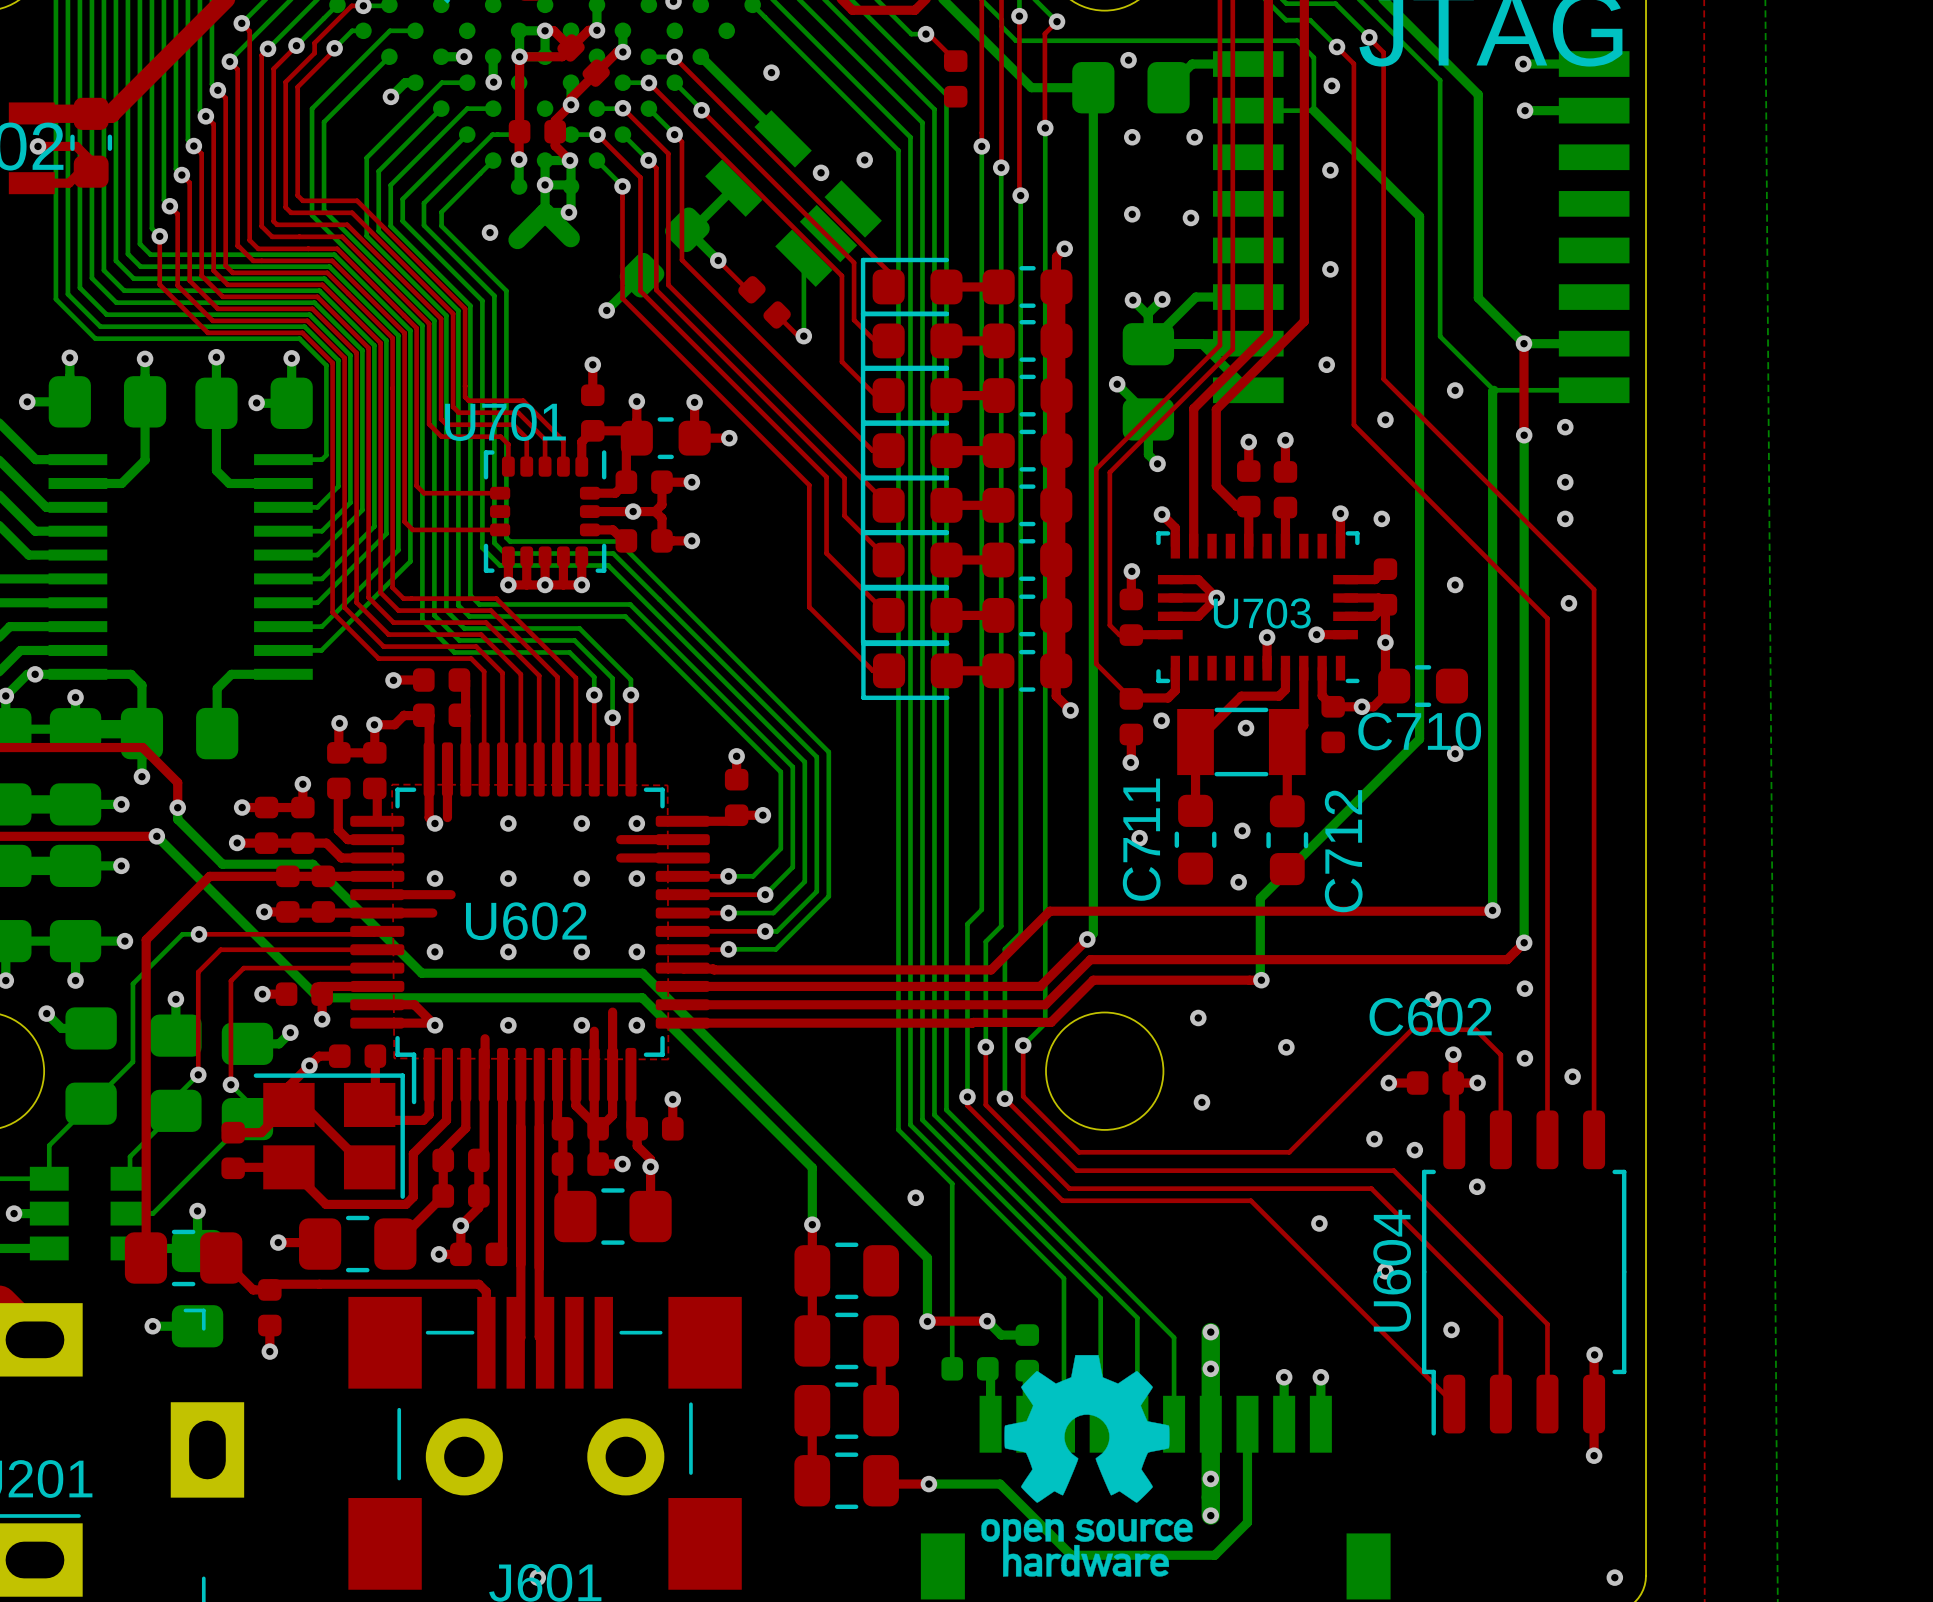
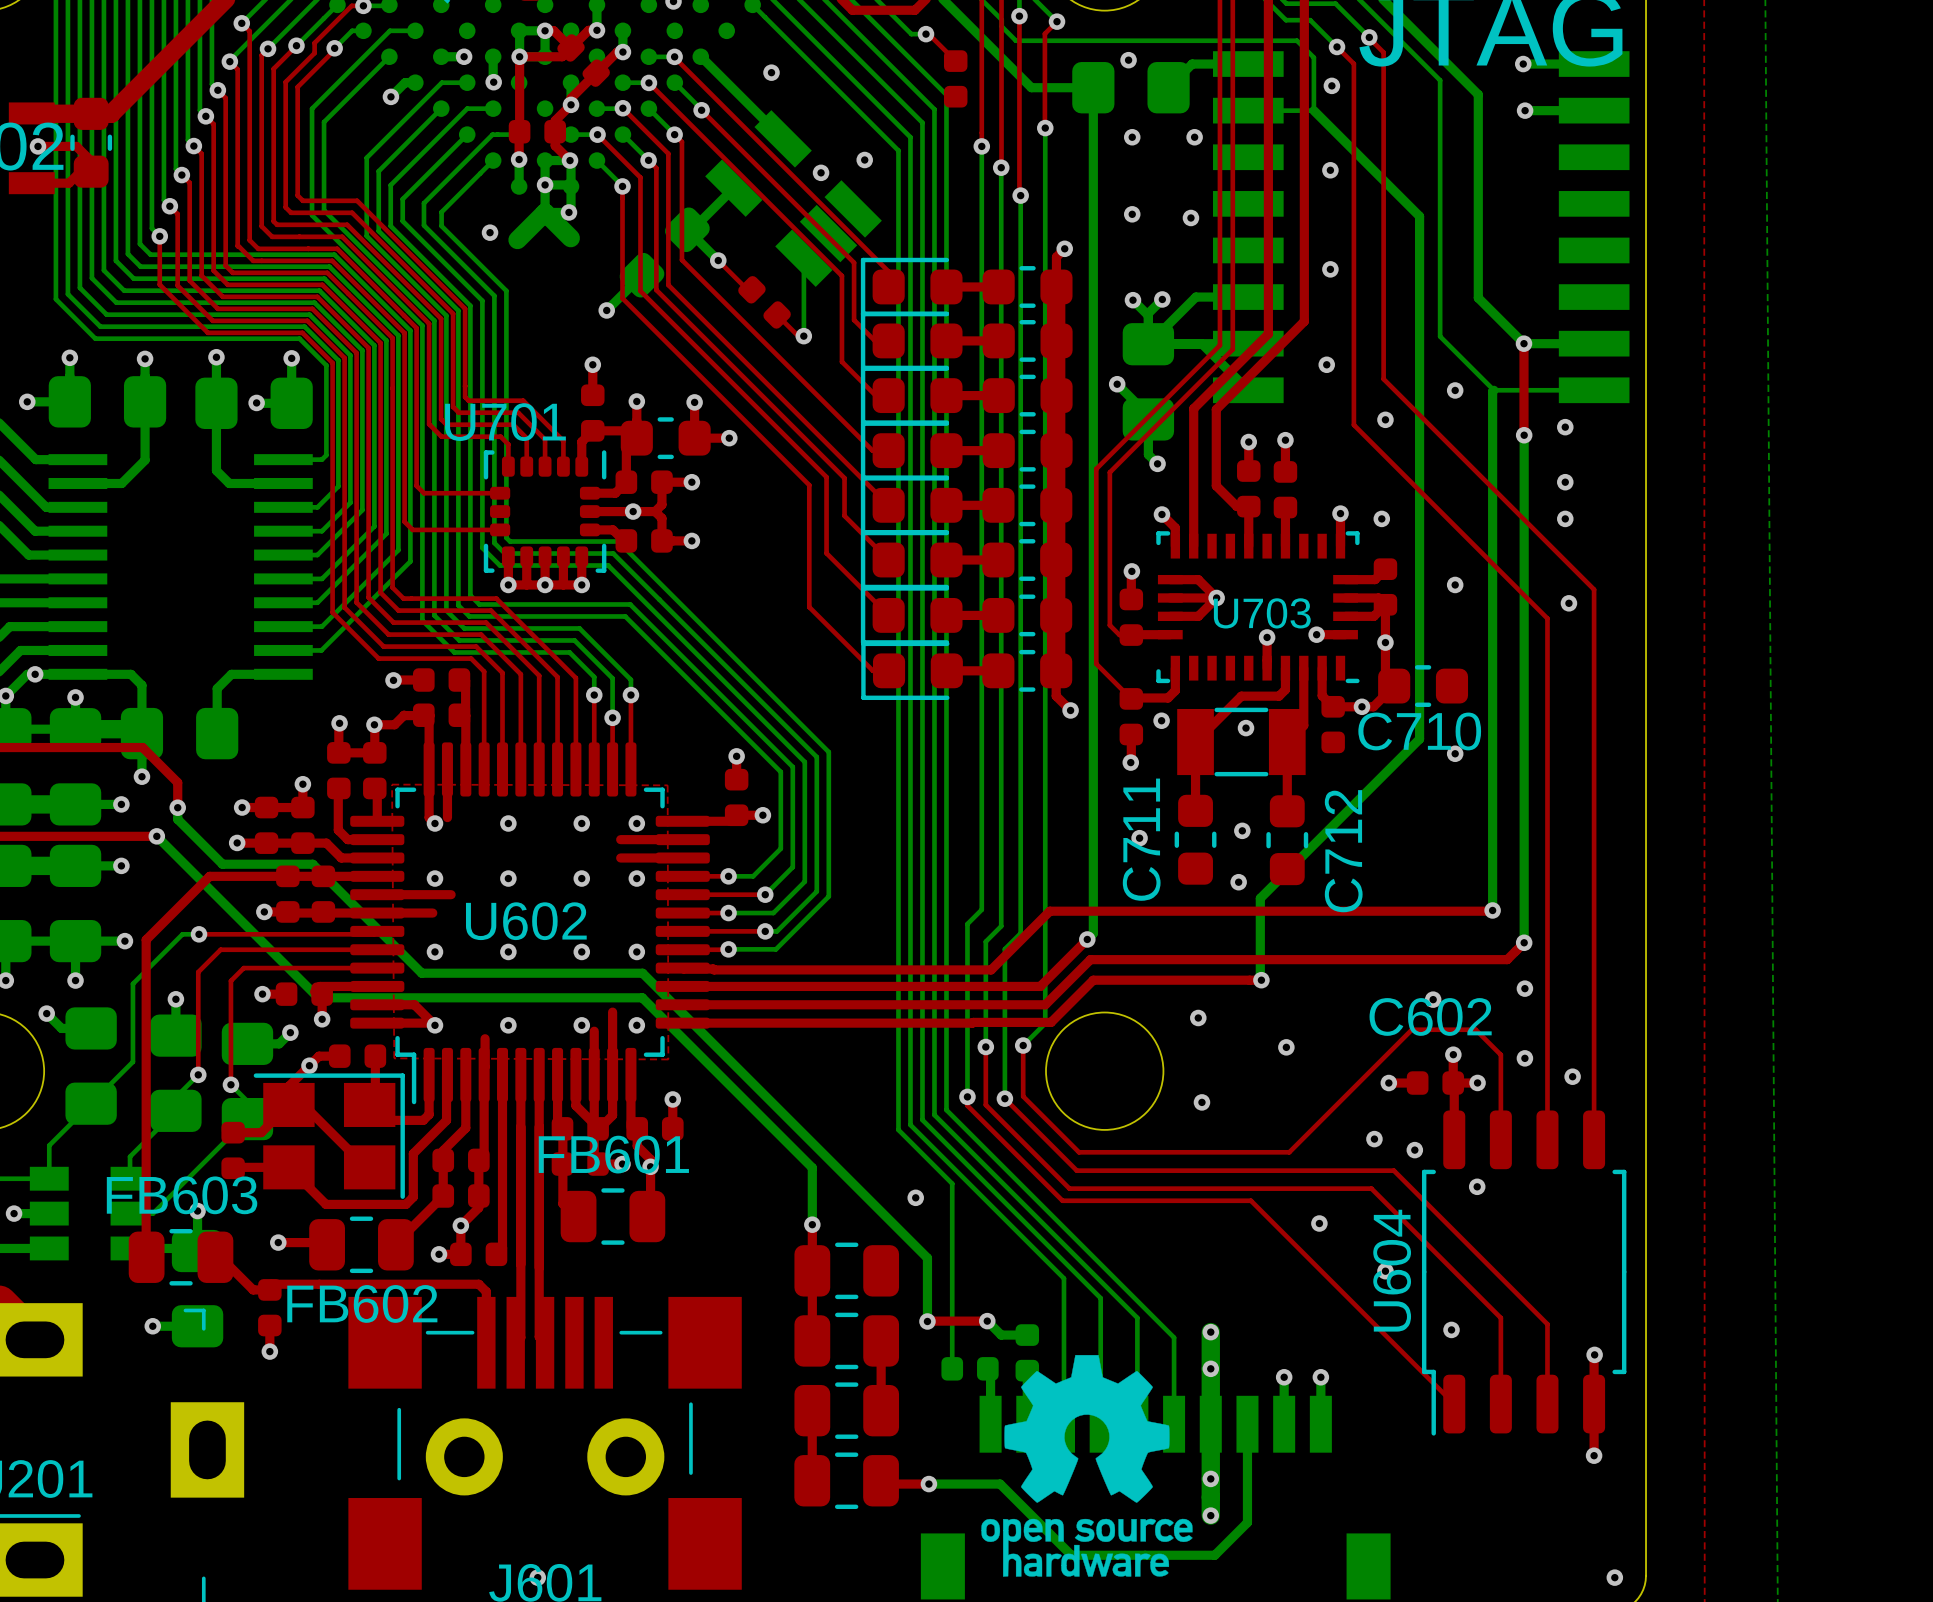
part: (612, 1216) -> none
FB601: none -> (612, 1216)
part: (357, 1244) -> none
FB602: none -> (361, 1244)
FB603: none -> (181, 1257)
part: (183, 1258) -> none

